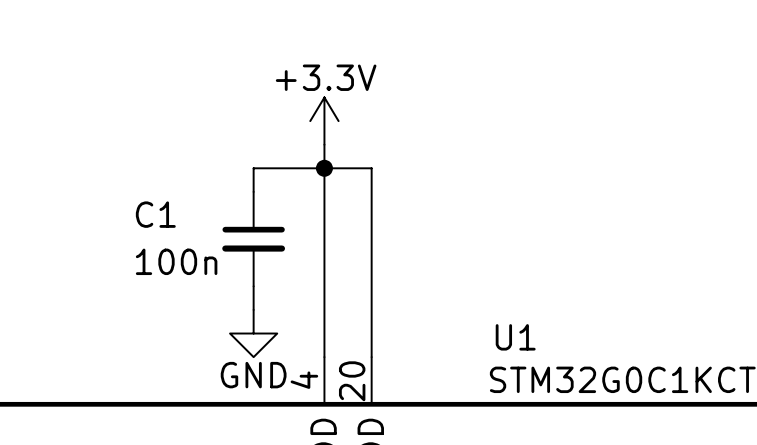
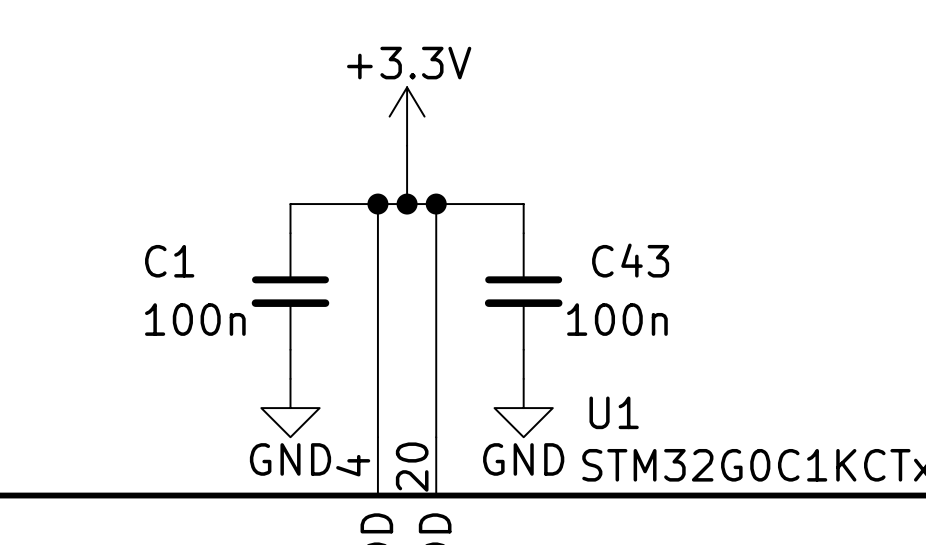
power symbol position: +3.3V (324, 121) -> +3.3V (407, 116)
wire: none -> (407, 145) (407, 204)
wire: (324, 144) (324, 168) -> (523, 349) (523, 378)
junction: none -> (407, 204)
wire: none -> (436, 204) (523, 204) (523, 233)
junction: none -> (436, 204)
C43: none -> 100n (523, 291)
power symbol: none -> GND (523, 408)

